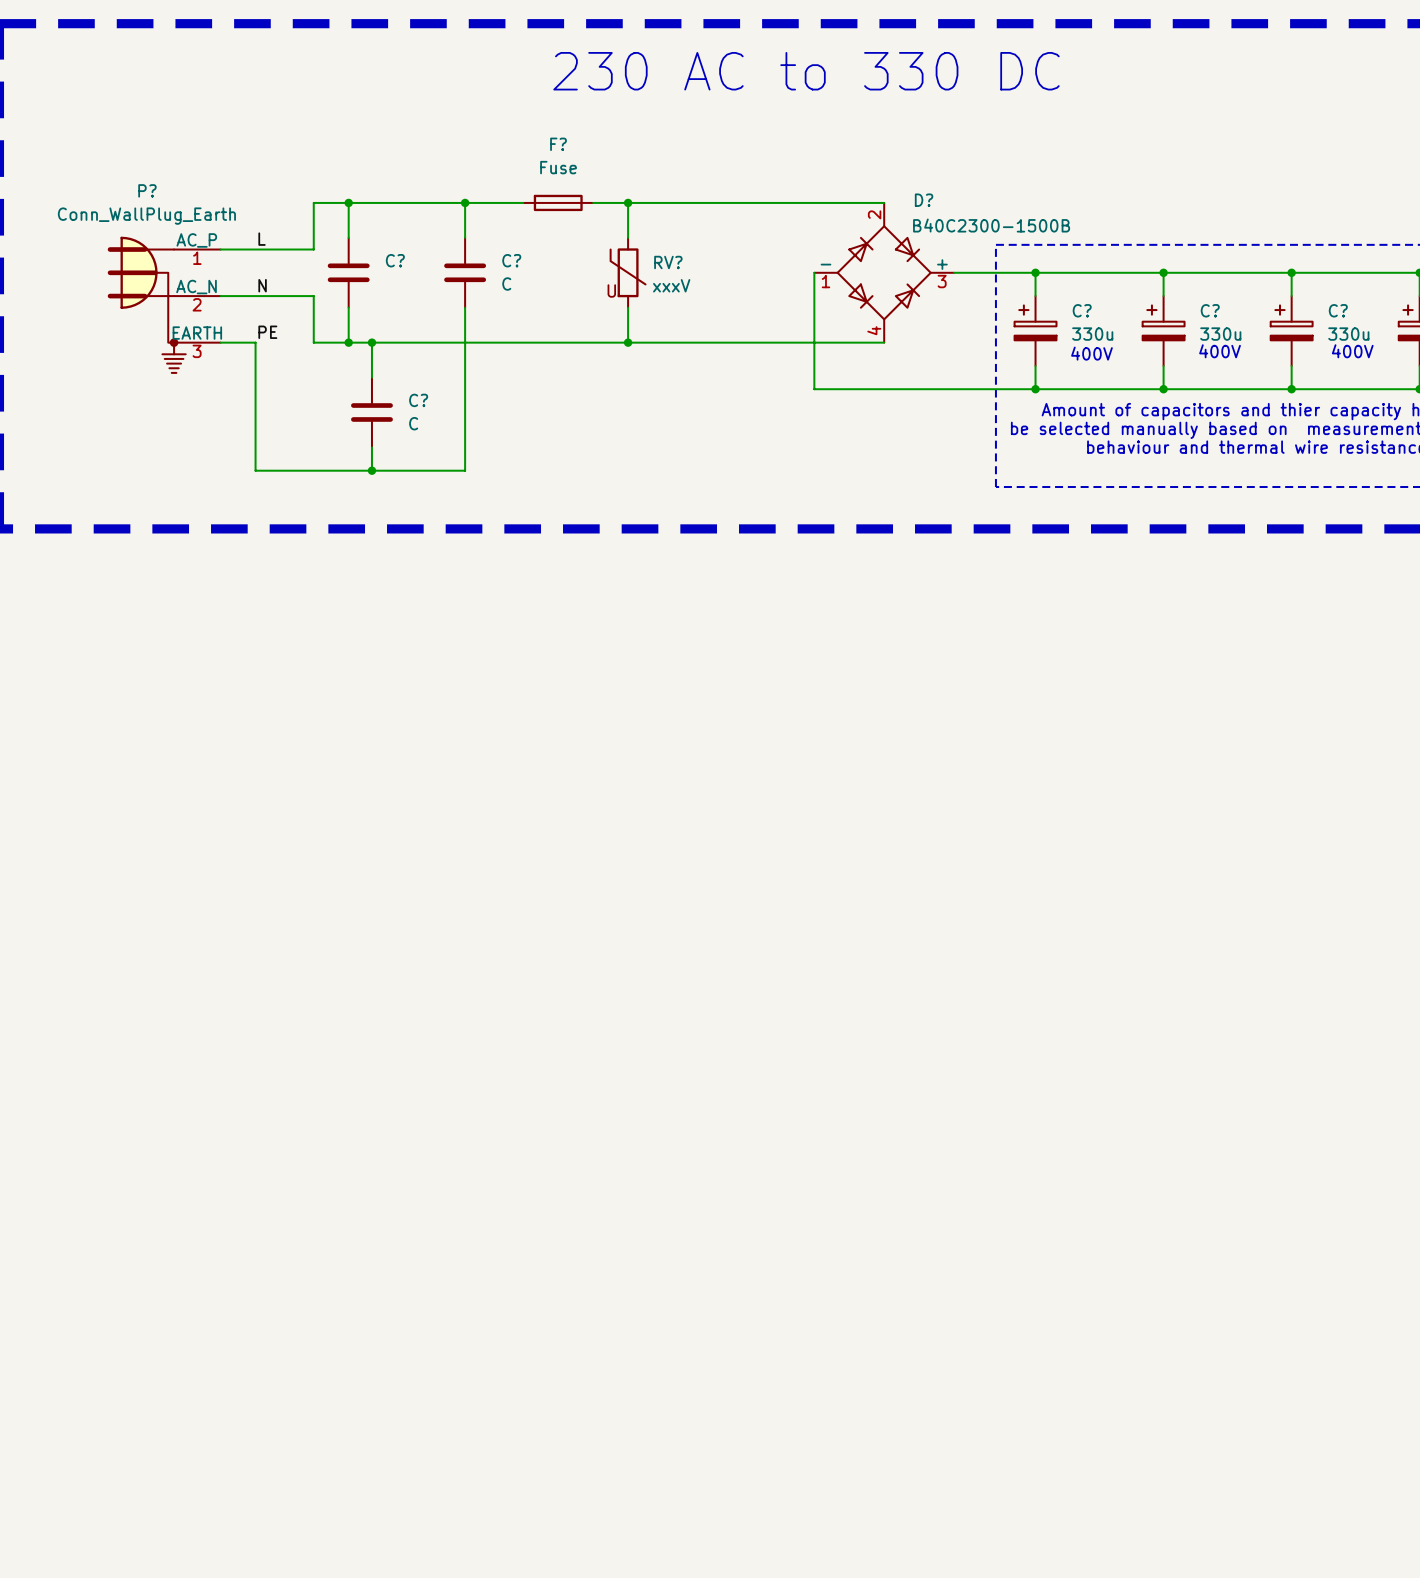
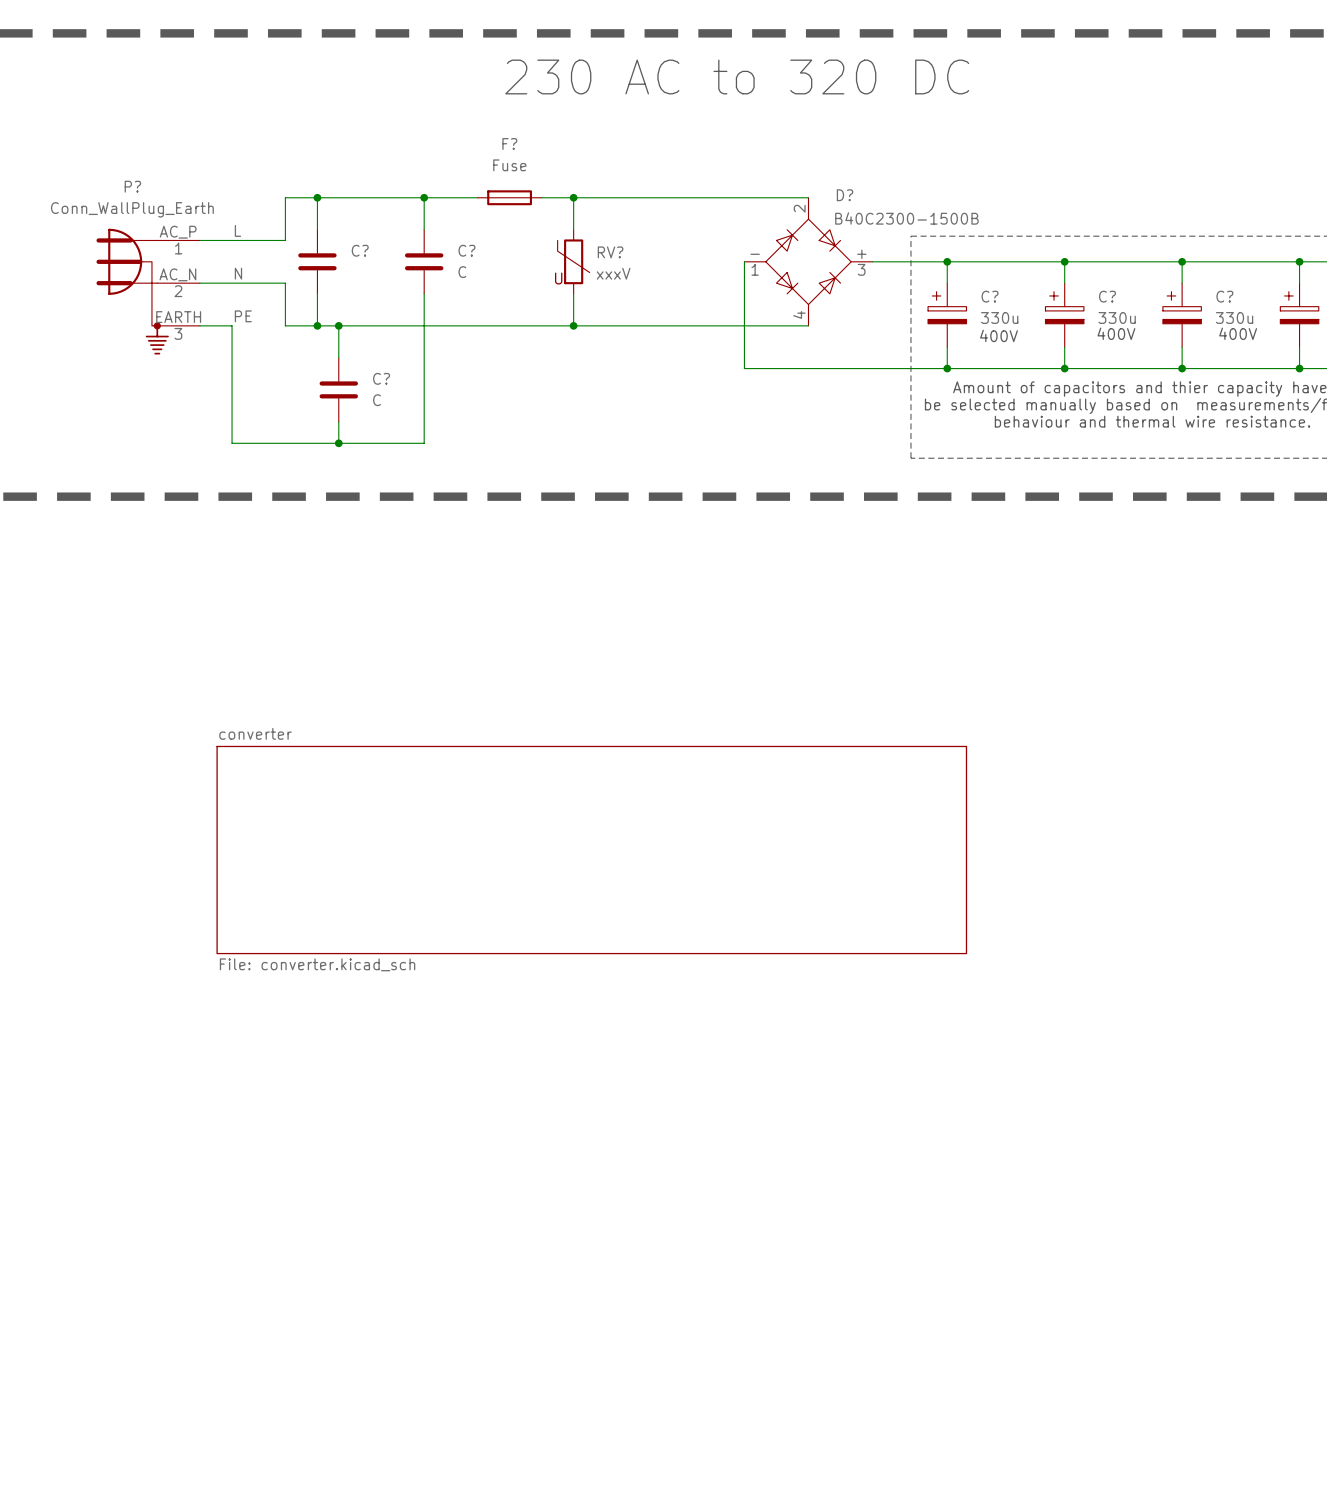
text: 230 AC to 330 DC (806, 71) -> 230 AC to 320 DC (737, 76)
sheet converter: none -> File: converter.kicad_sch (591, 850)

